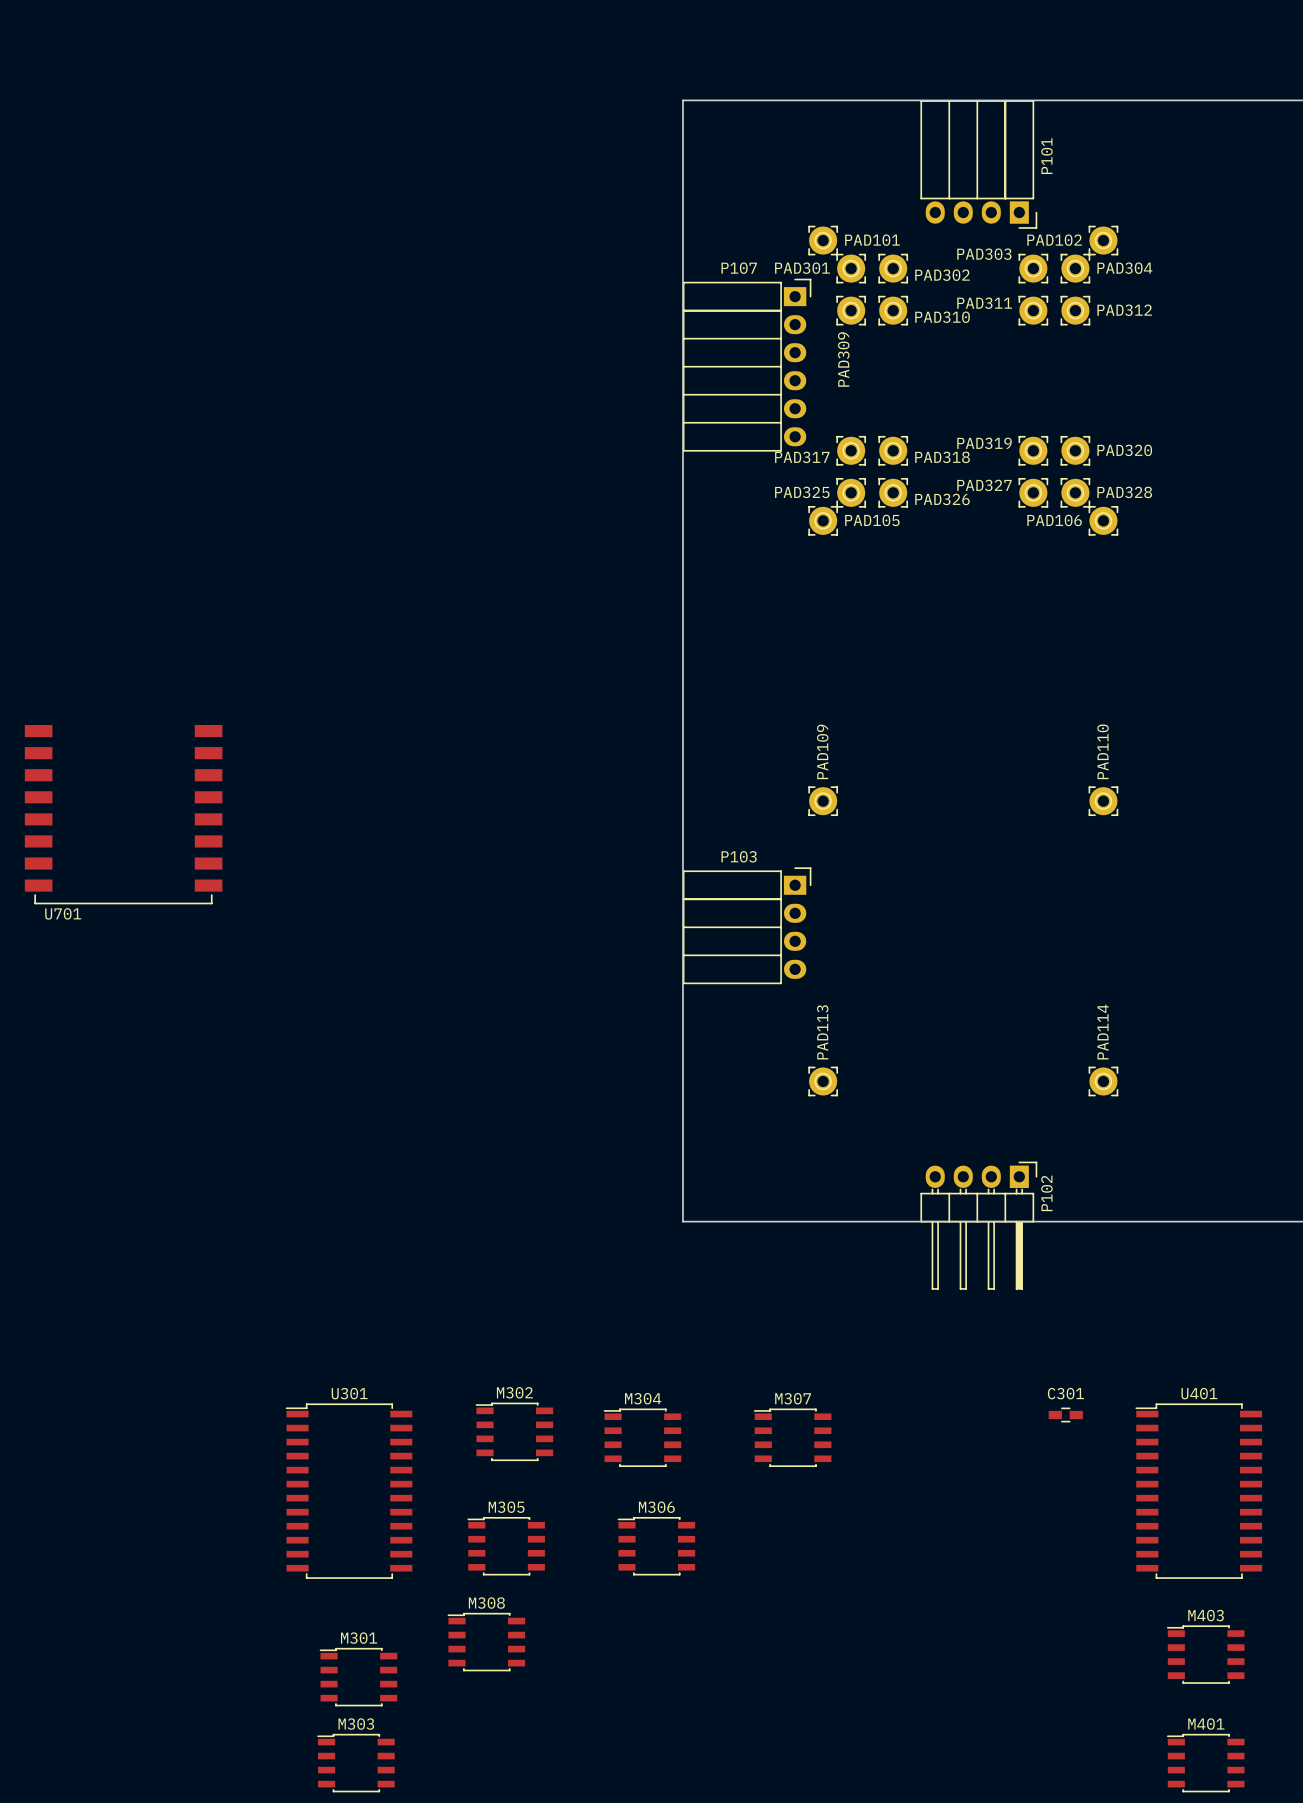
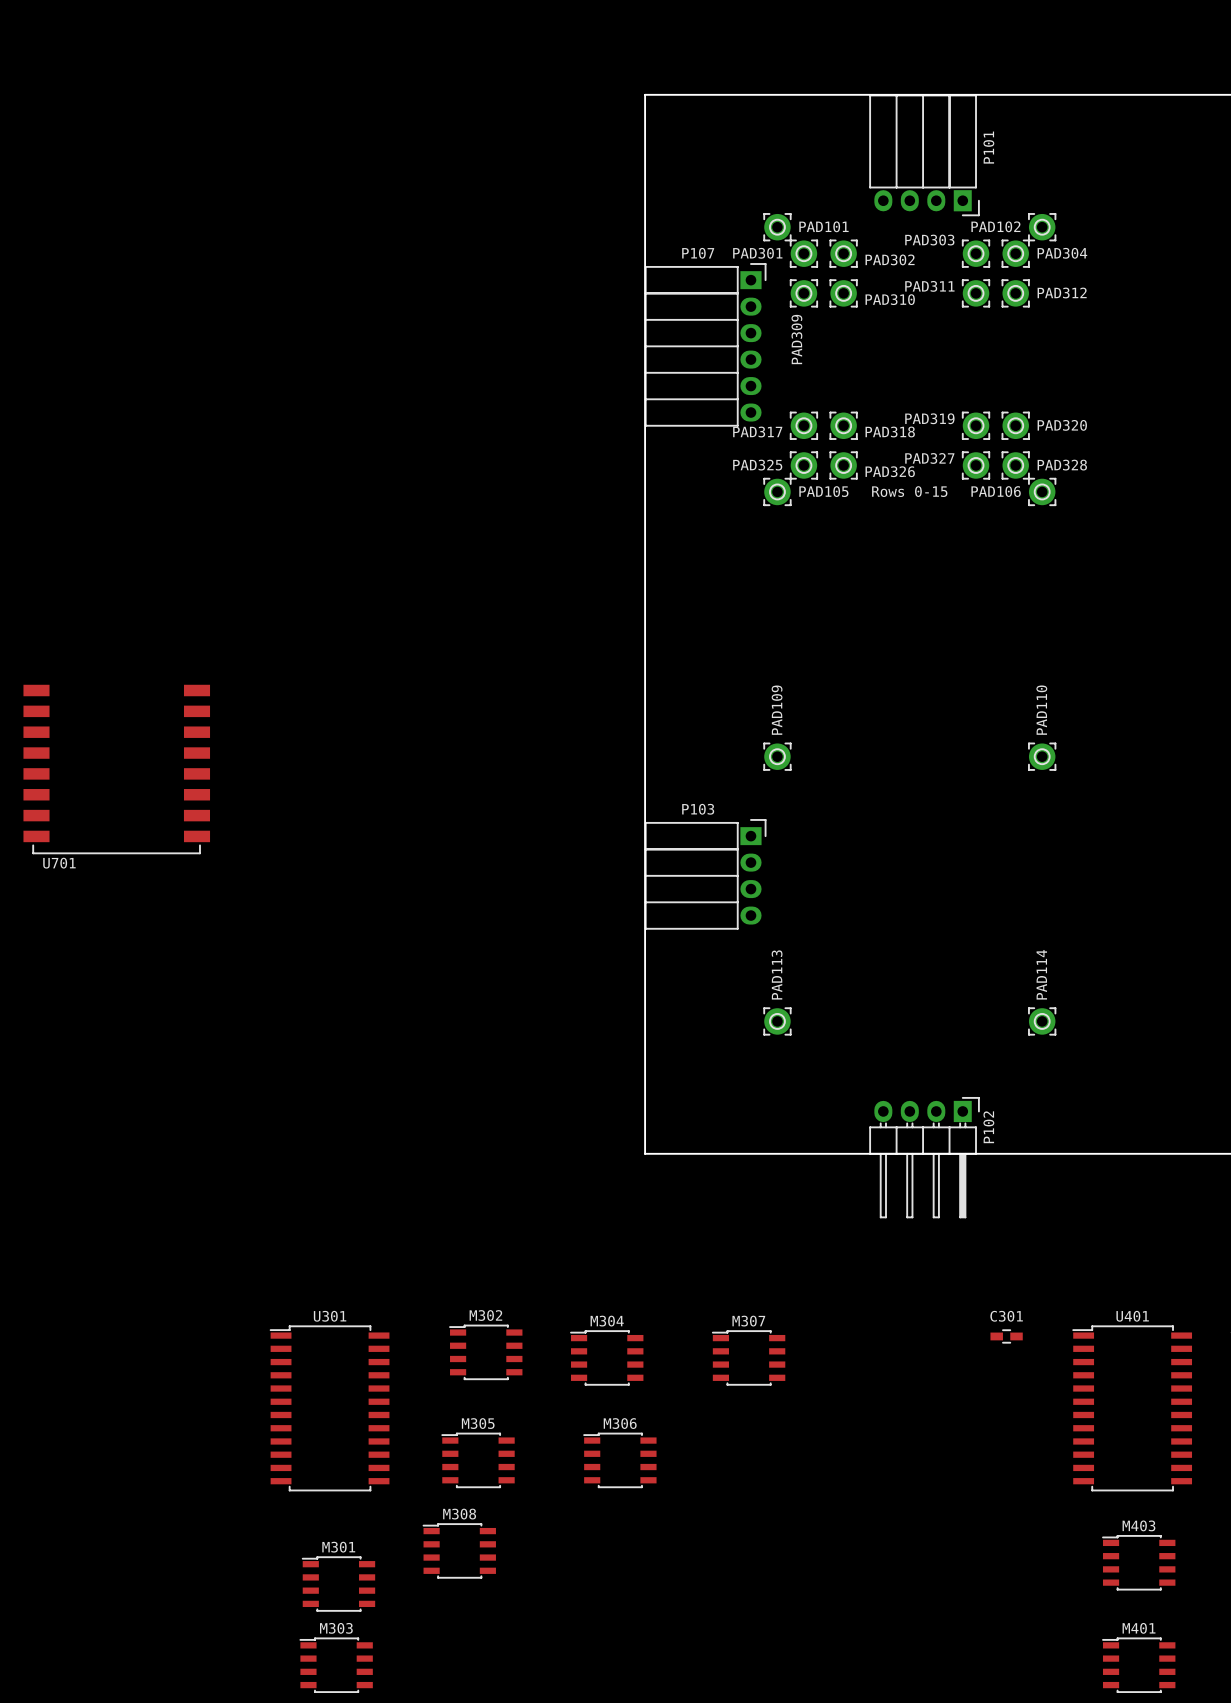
text: none -> Rows 0-15 (909, 491)

